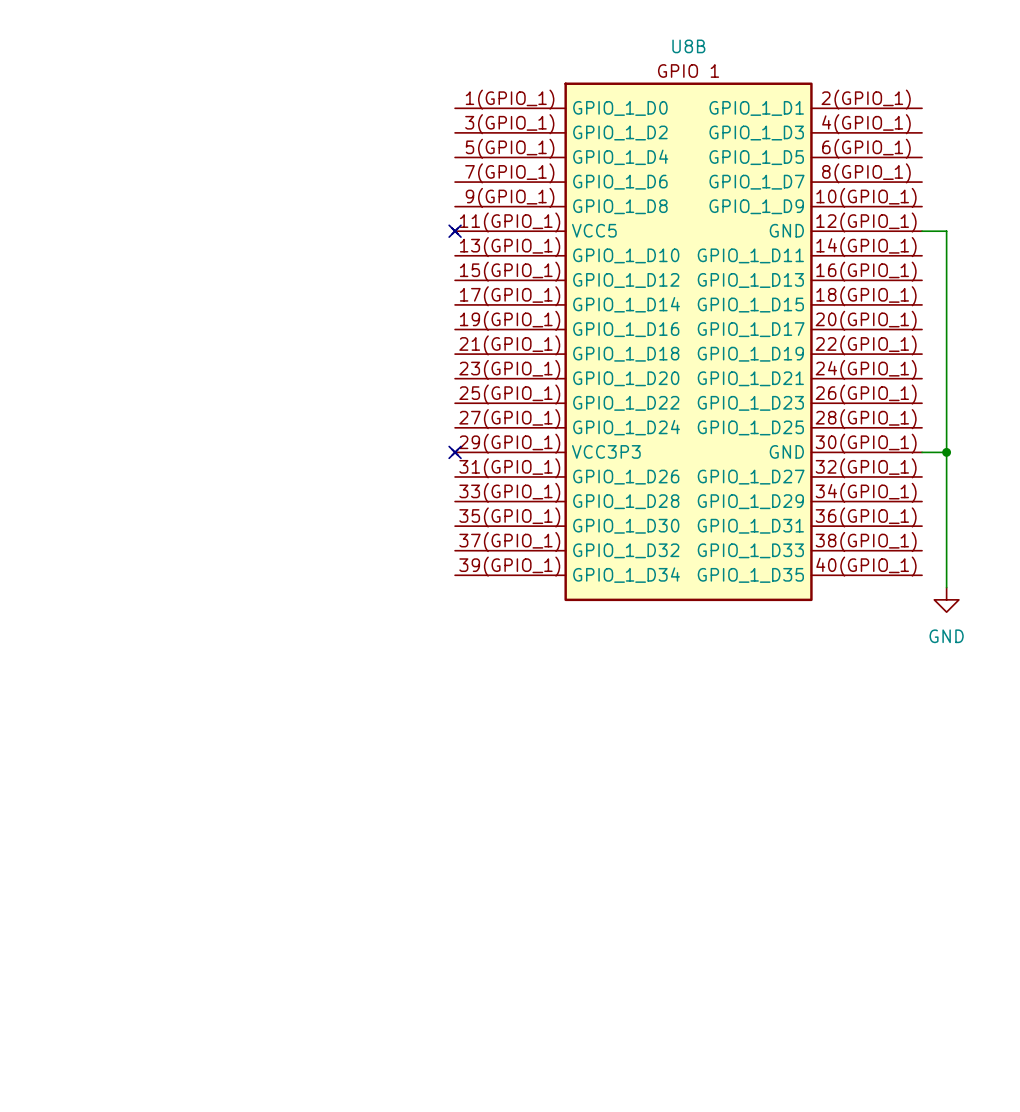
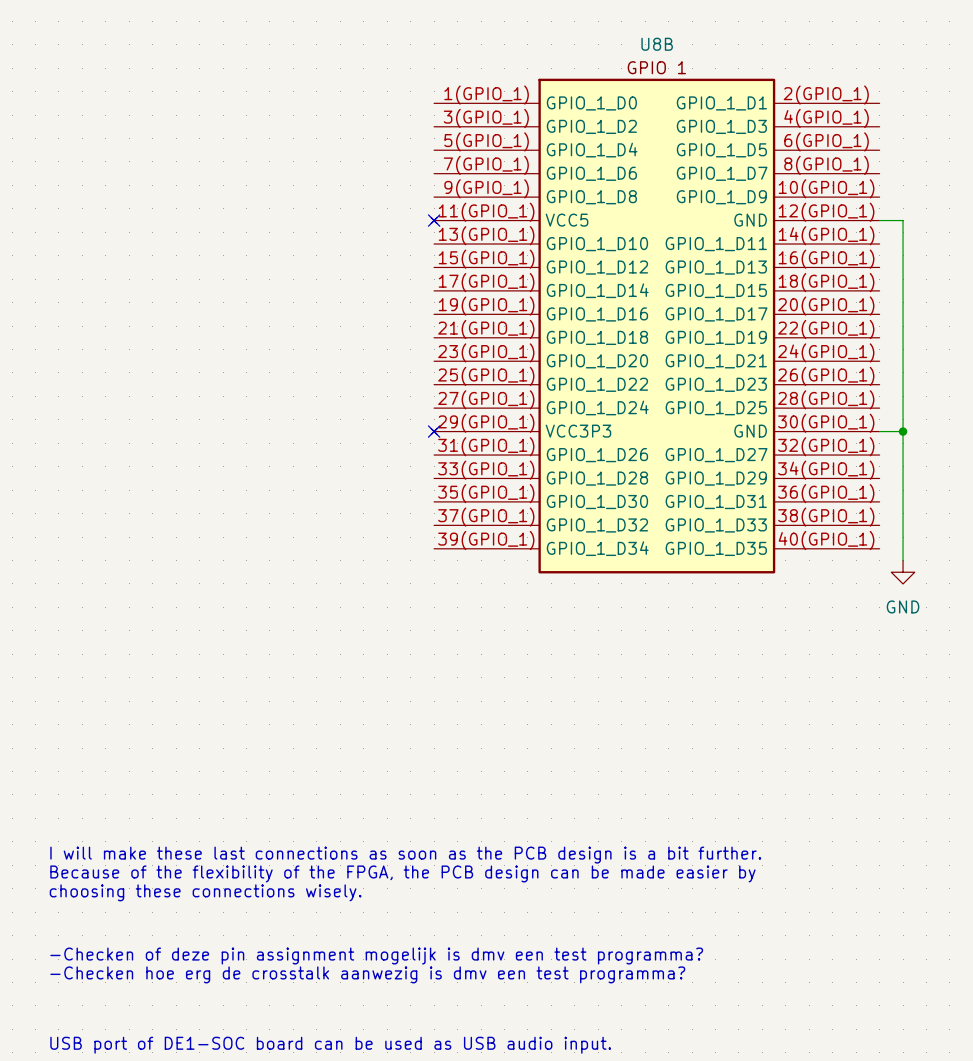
text: none -> I will make these last connections as soon as the PCB design is a bit further. (405, 855)
text: none -> Because of the flexibility of the FPGA, the PCB design can be made easier by (402, 873)
text: none -> choosing these connections wisely. (205, 892)
text: none -> -Checken of deze pin assignment mogelijk is dmv een test programma? (376, 956)
text: none -> -Checken hoe erg de crosstalk aanwezig is dmv een test programma? (367, 974)
text: none -> USB port of DE1-SOC board can be used as USB audio input. (330, 1045)

